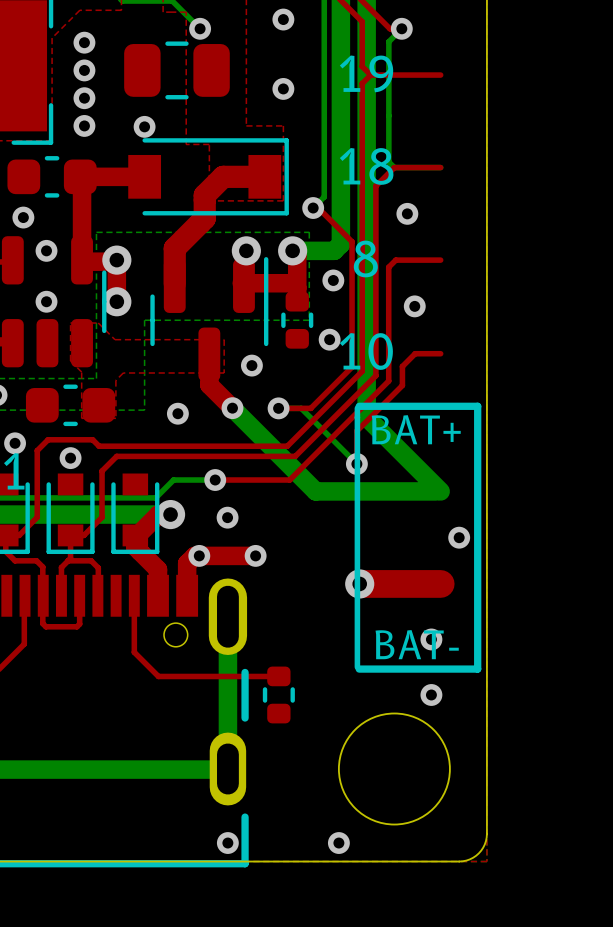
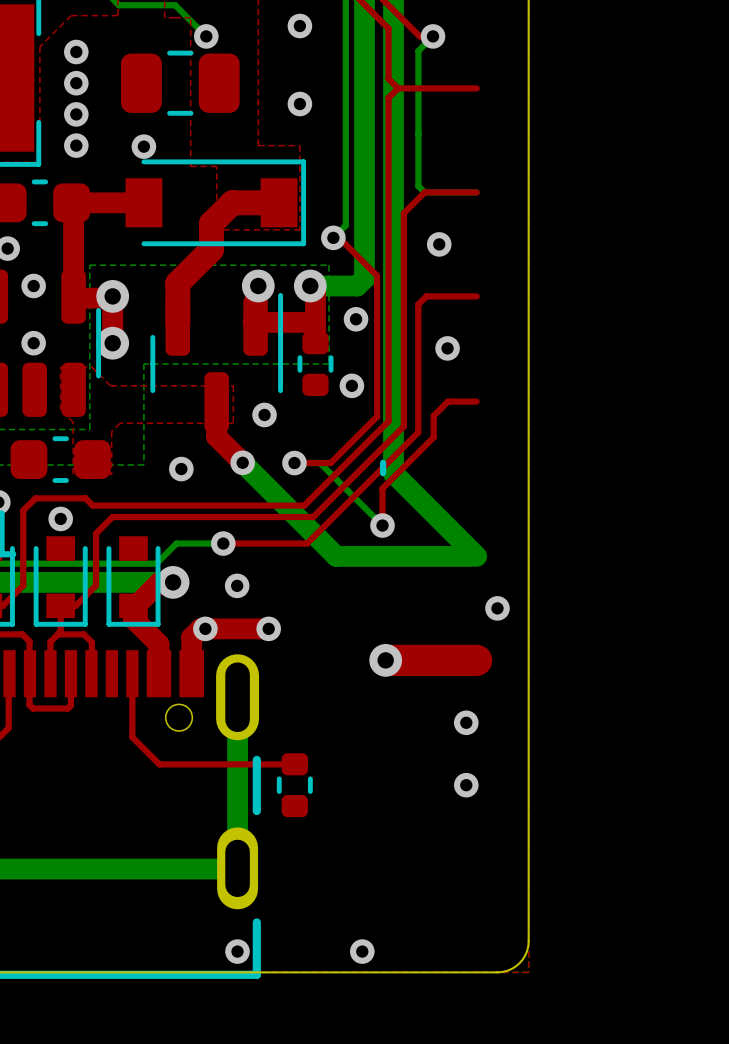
text: 19 (366, 73) -> none
text: 18 (366, 166) -> none
text: 8 (365, 258) -> none
text: 10 (366, 351) -> none
line: (359, 406) (477, 406) (477, 669) (359, 669) -> none
line: (357, 417) (357, 667) -> none
text: BAT+ (416, 429) -> none
text: BAT- (417, 644) -> none
round board edge: [337, 712, 451, 826] -> none

